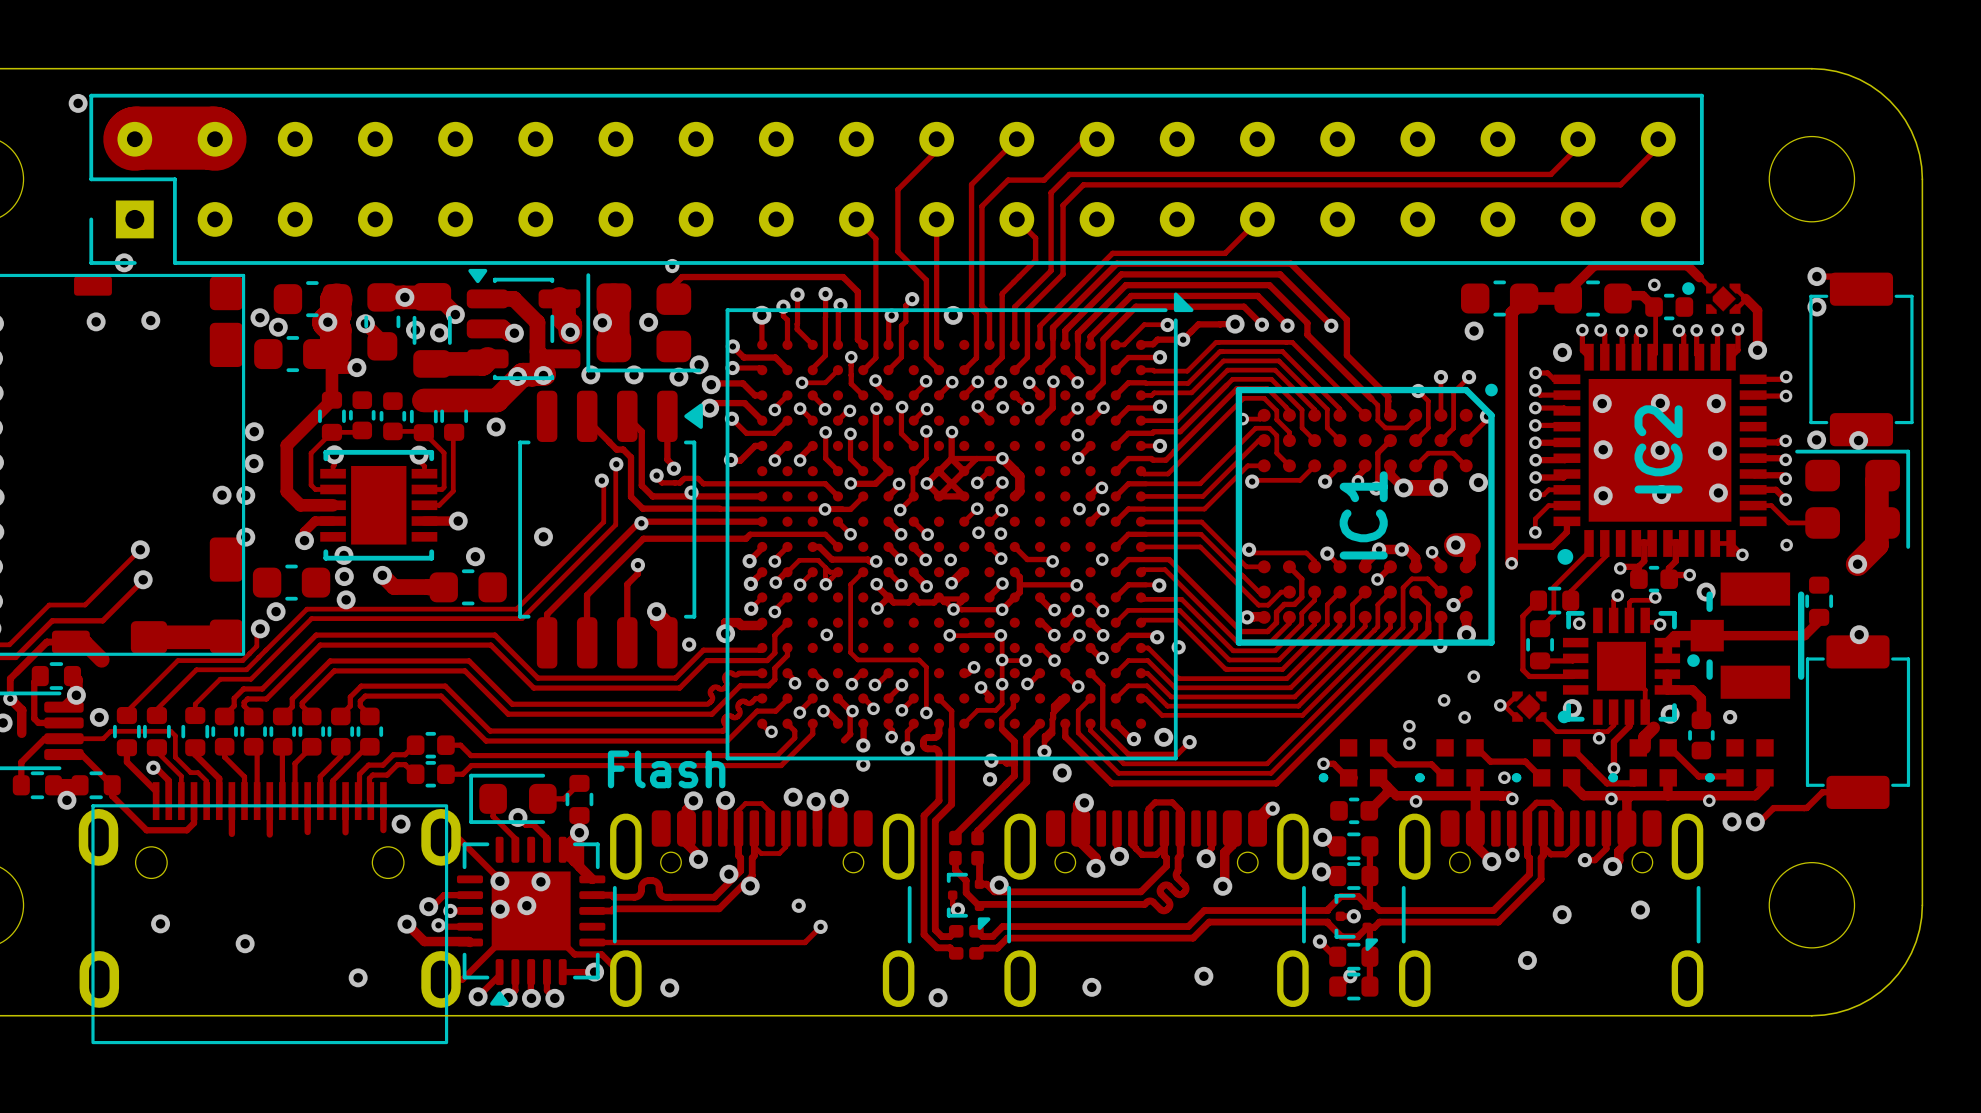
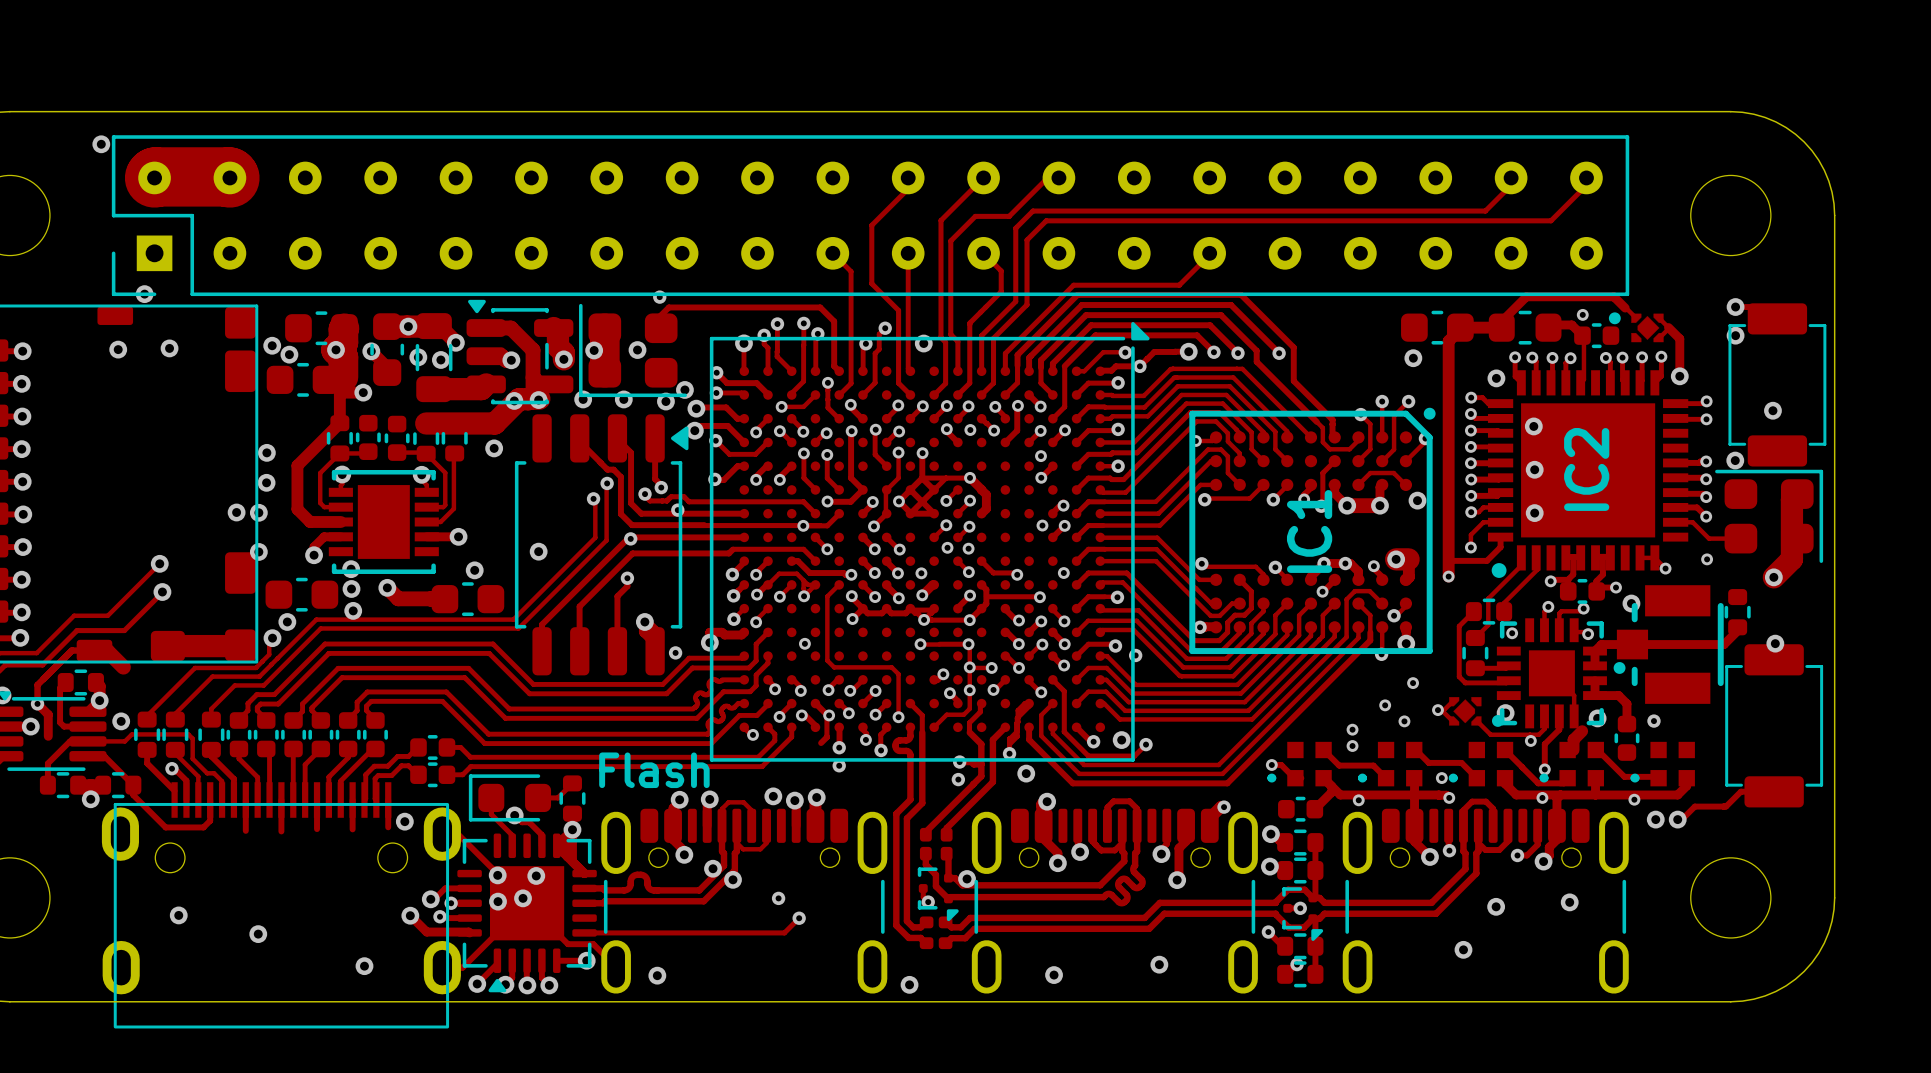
via: (1660, 403) -> none
via: (1716, 403) -> none
via position: (1858, 440) -> (1772, 410)
via: (1660, 450) -> none
via: (1717, 450) -> none
via: (1718, 492) -> none
via: (1661, 494) -> none

